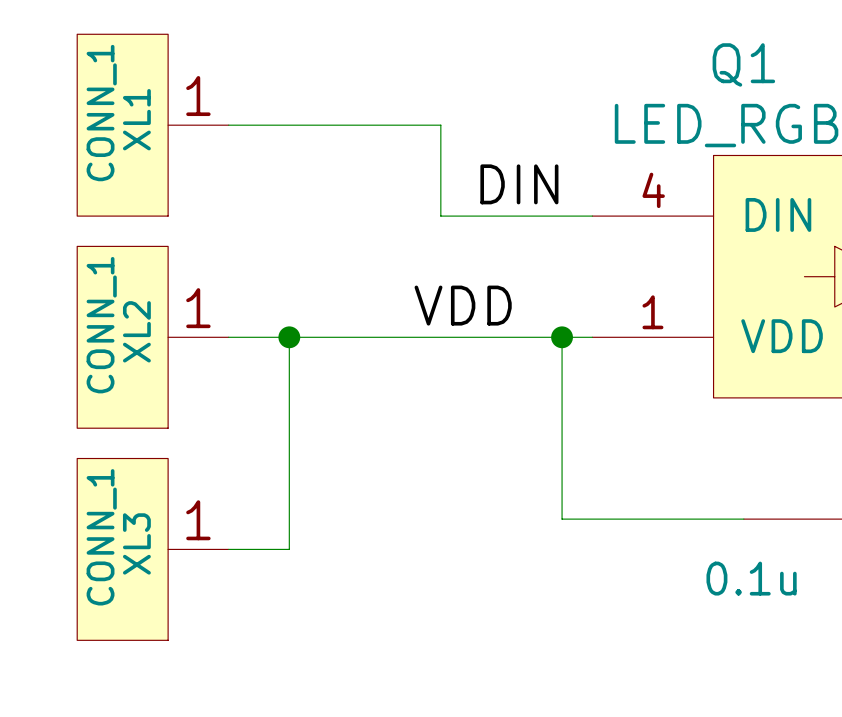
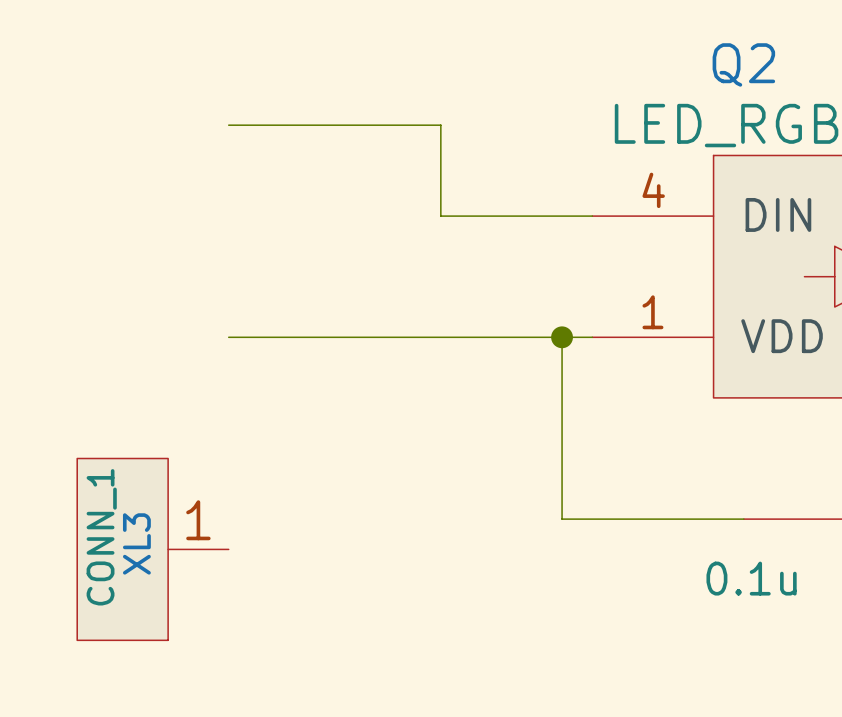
Q1 name: Q1 (743, 64) -> Q2 (743, 64)
XL1: CONN_1 (152, 125) -> none
label: DIN (519, 184) -> none
label: VDD (463, 305) -> none
XL2: CONN_1 (152, 337) -> none
wire: (289, 337) (289, 549) (228, 549) -> none
junction: (289, 337) -> none

